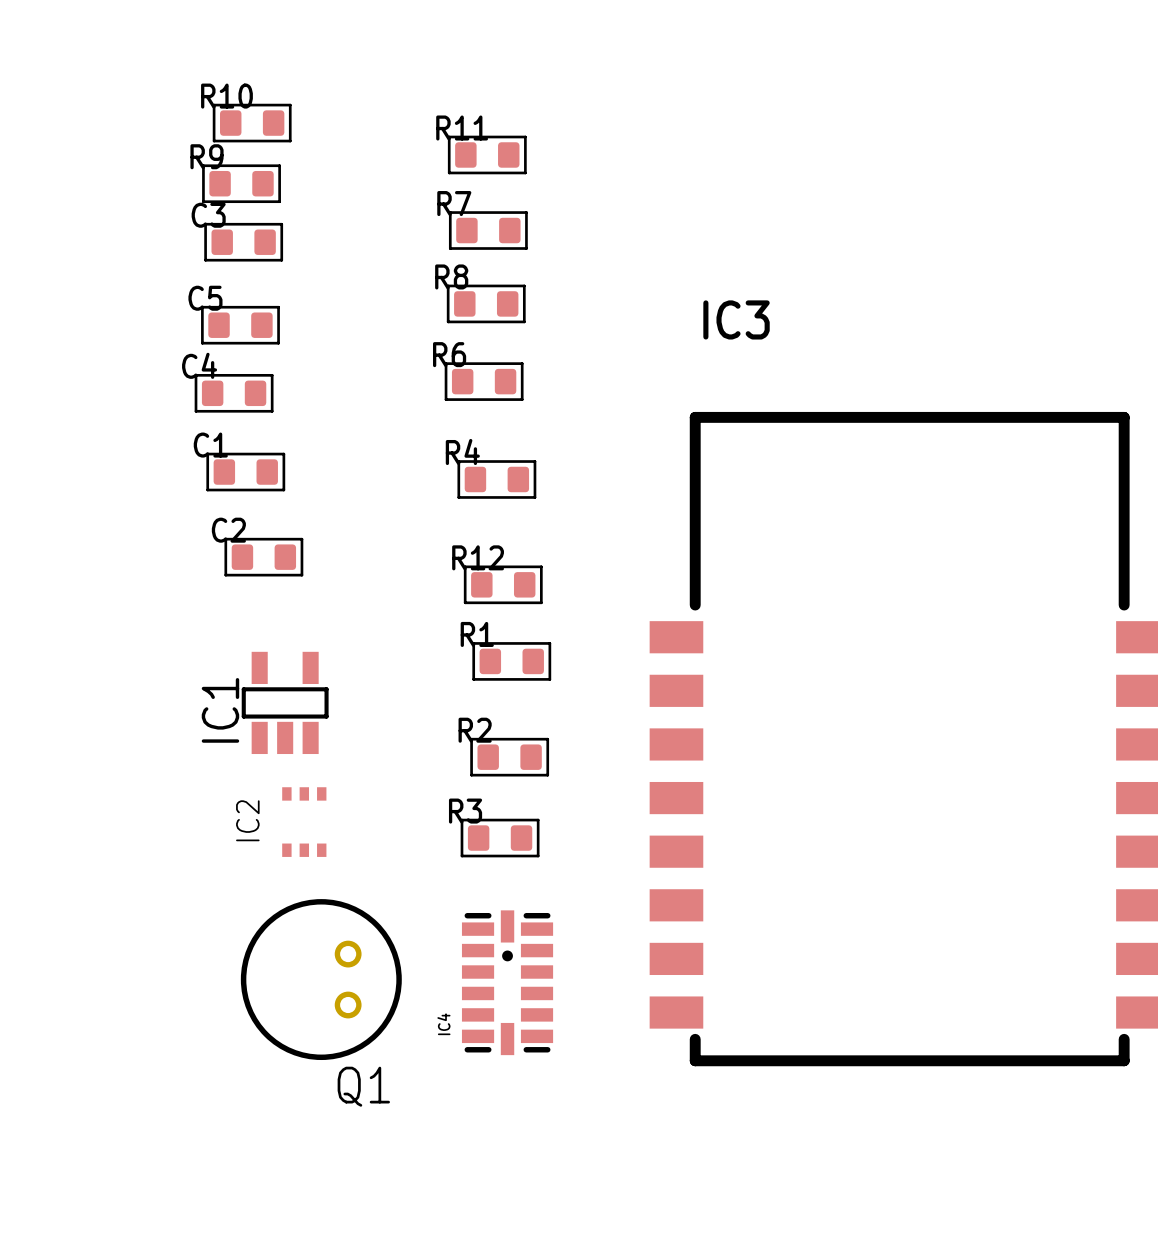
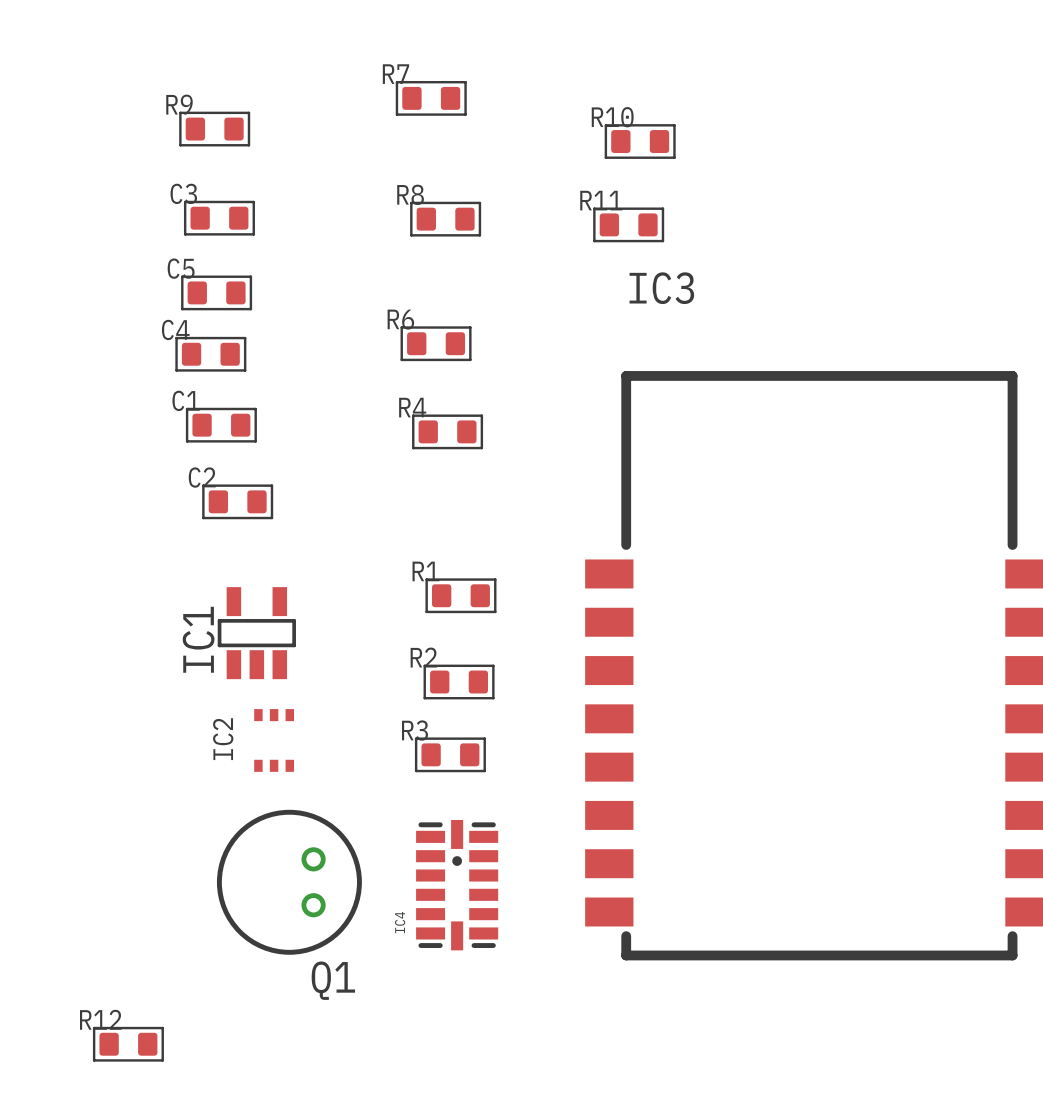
R10 position: (252, 123) -> (640, 141)
R11 position: (487, 154) -> (628, 224)
R9 position: (241, 183) -> (214, 129)
R7 position: (488, 230) -> (431, 98)
R8 position: (486, 303) -> (445, 219)
R12 position: (503, 584) -> (128, 1044)

